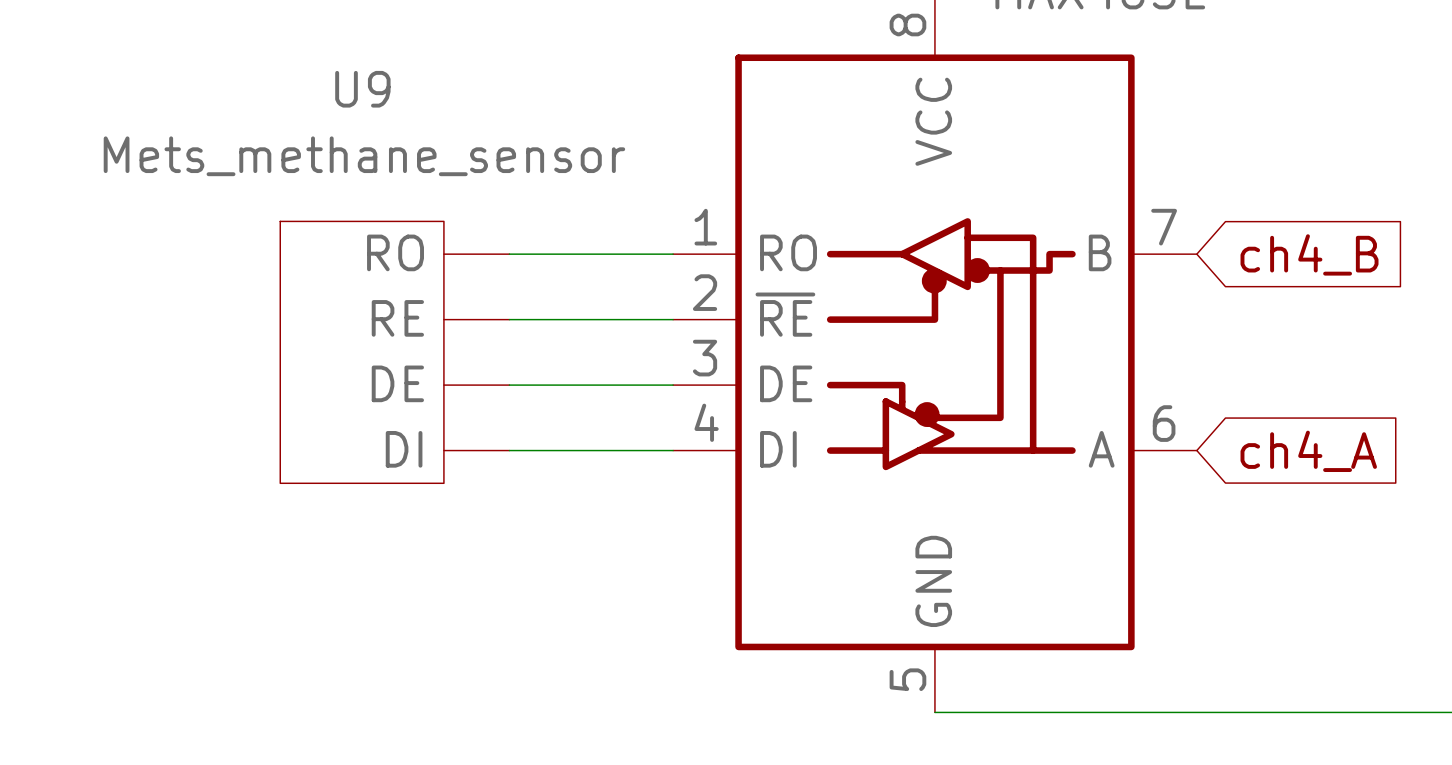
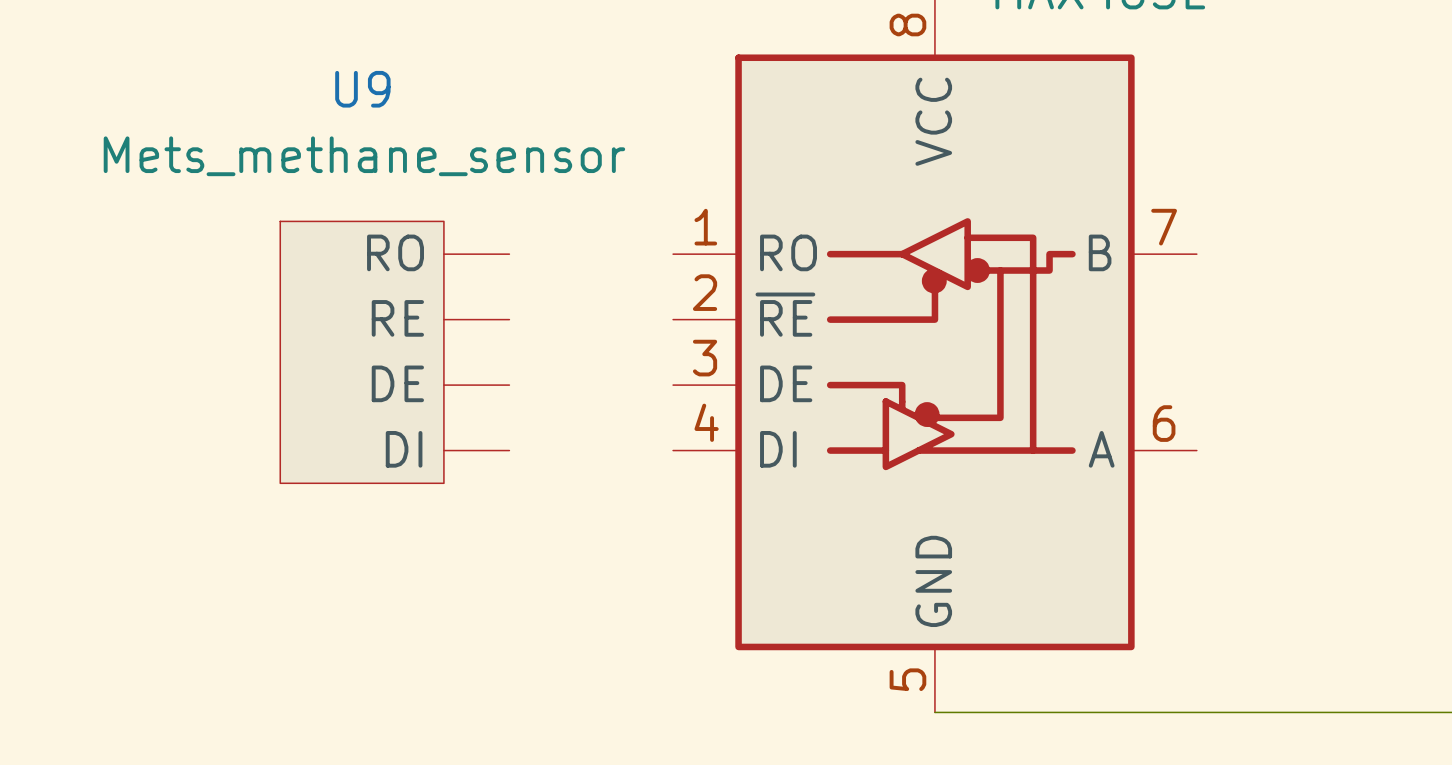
wire: (509, 254) (673, 254) -> none
global label: ch4_B (1309, 254) -> none
wire: (509, 319) (673, 319) -> none
wire: (509, 385) (673, 385) -> none
wire: (509, 450) (673, 450) -> none
global label: ch4_A (1308, 451) -> none

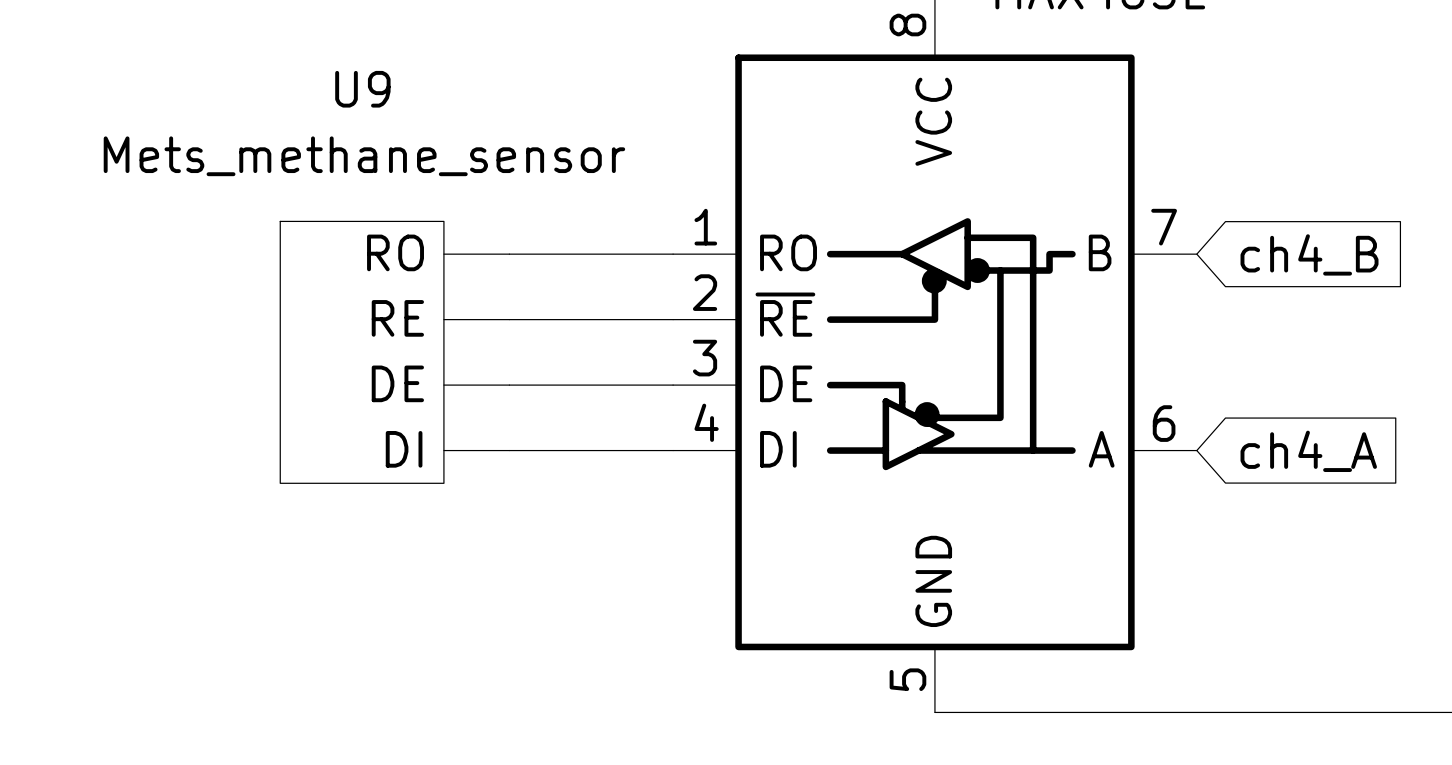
wire: none -> (509, 254) (673, 254)
global label: none -> ch4_B (1309, 254)
wire: none -> (509, 319) (673, 319)
wire: none -> (509, 385) (673, 385)
wire: none -> (509, 450) (673, 450)
global label: none -> ch4_A (1308, 451)

